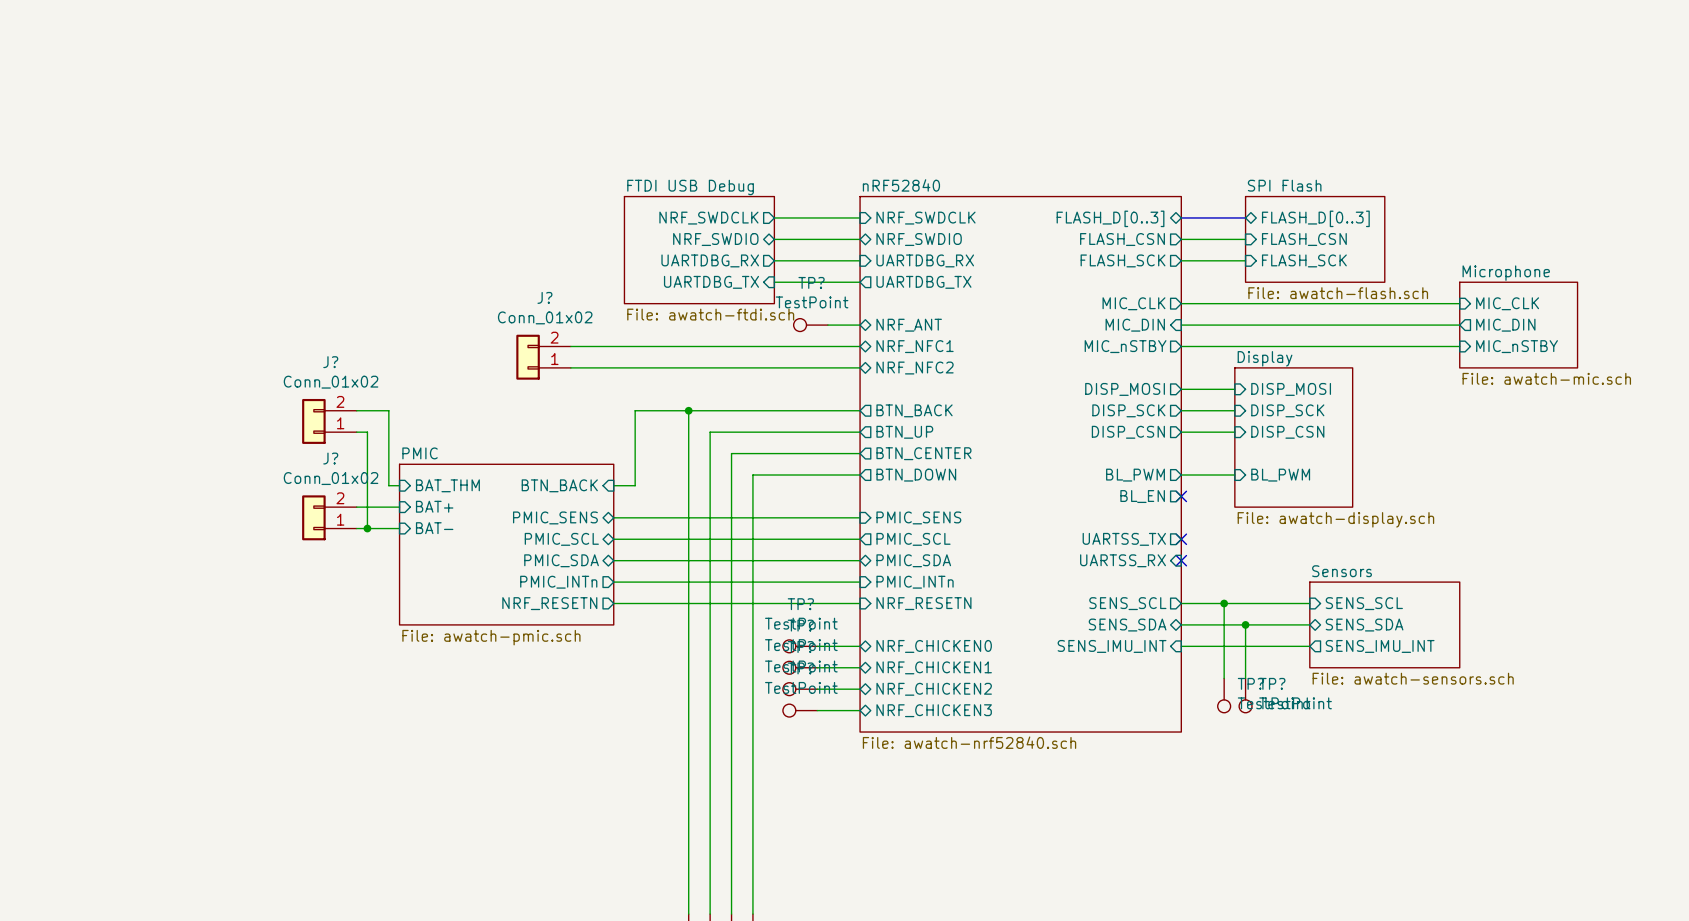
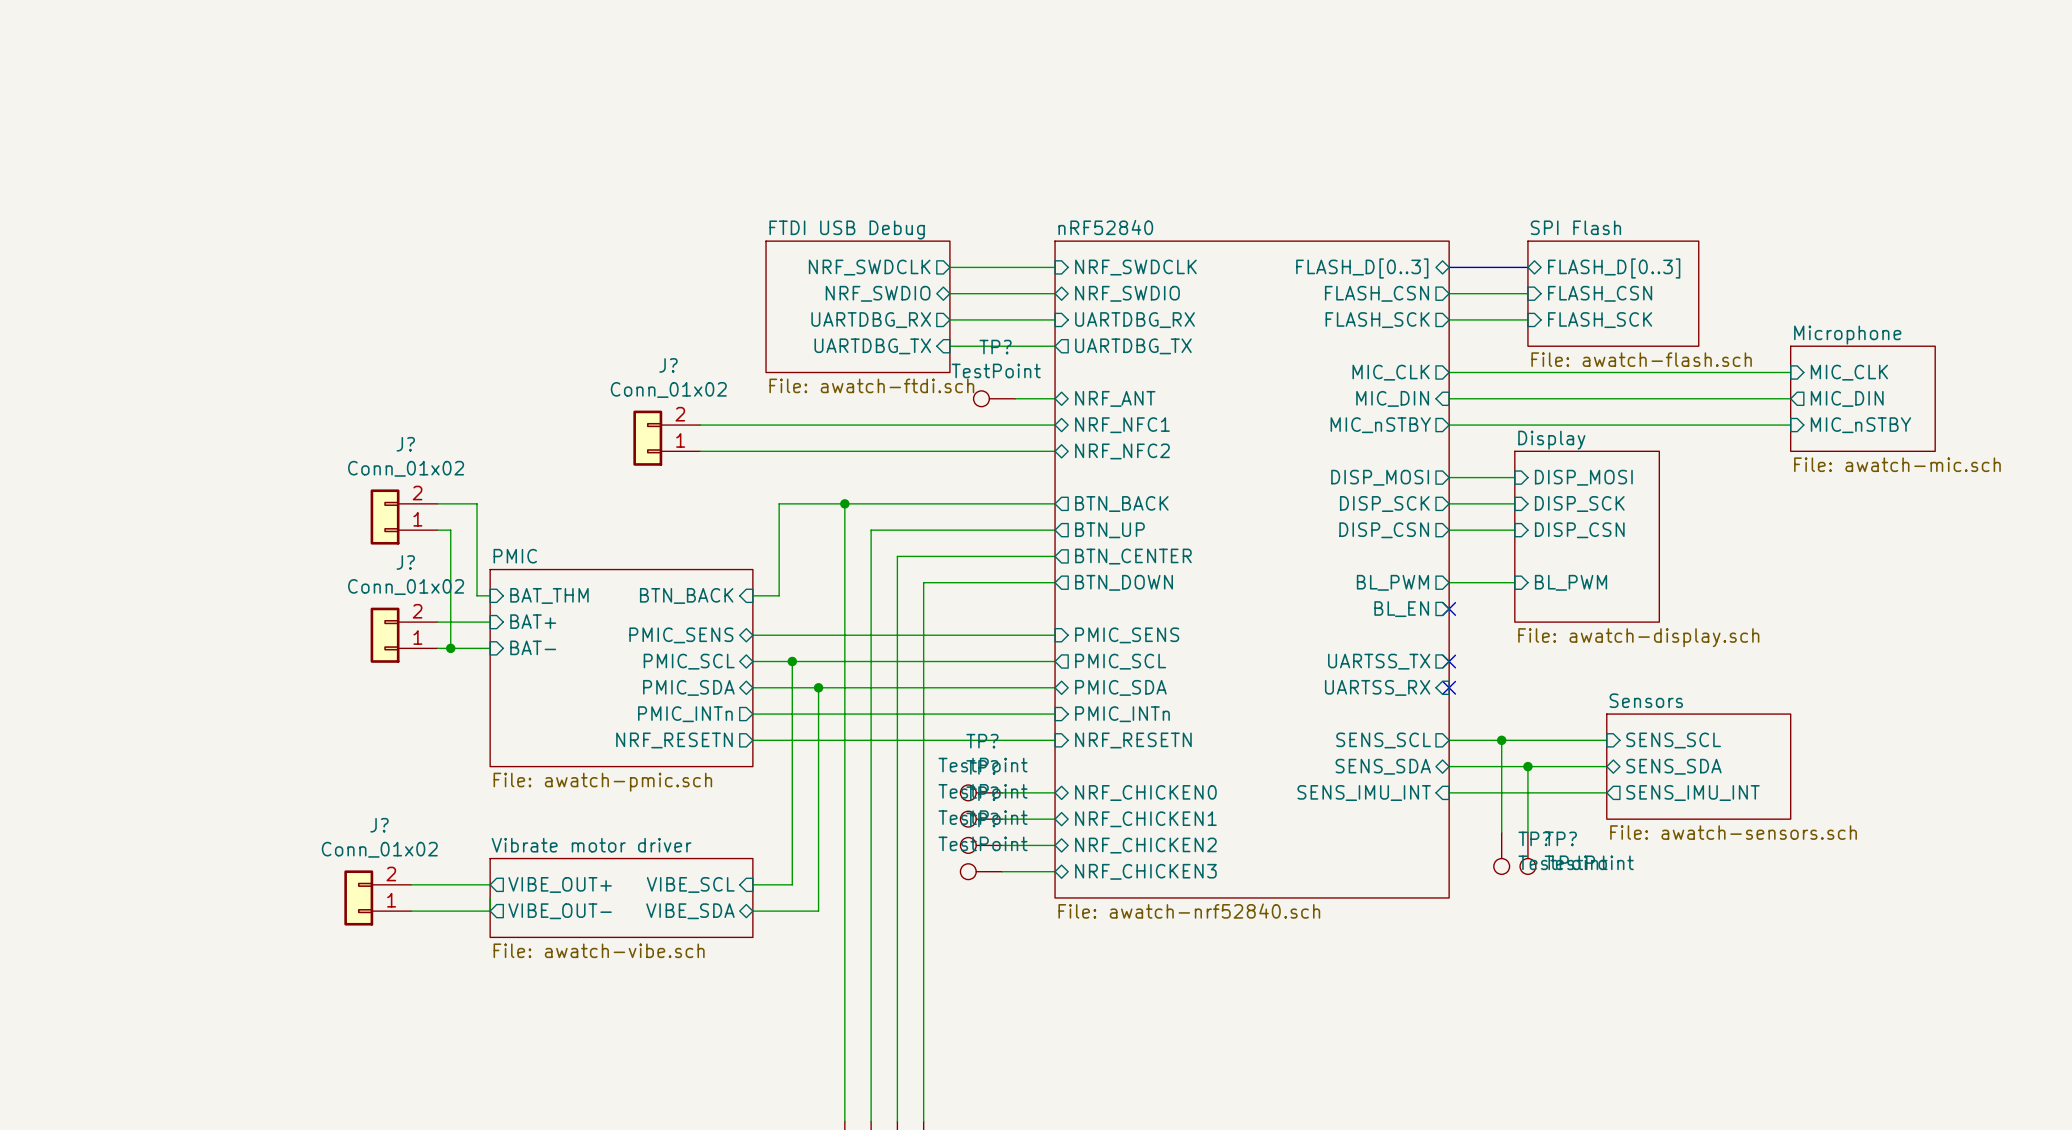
wire: none -> (792, 661) (792, 884) (752, 884)
junction: none -> (792, 661)
wire: none -> (818, 687) (818, 911) (752, 911)
junction: none -> (818, 687)
wire: none -> (411, 884) (490, 884)
sheet pin: none -> VIBE_OUT+ (560, 884)
sheet pin: none -> VIBE_SCL (690, 884)
J?: none -> Conn_01x02 (377, 897)
wire: none -> (490, 897) (490, 911) (411, 911)
sheet Vibrate motor driver: none -> File: awatch-vibe.sch (621, 897)
sheet pin: none -> VIBE_OUT- (560, 911)
sheet pin: none -> VIBE_SDA (690, 911)

